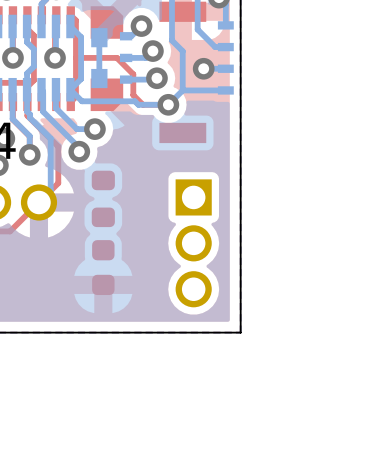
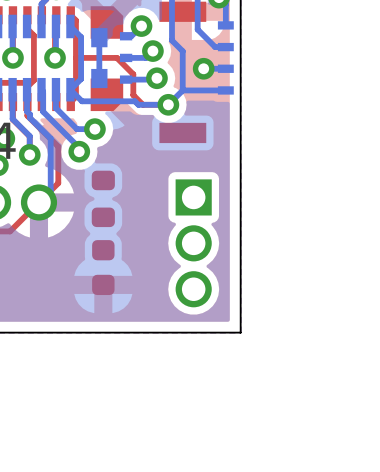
bottom track: (27, 26) (27, 42) (33, 49) (33, 66) (27, 73) (27, 89) -> none

